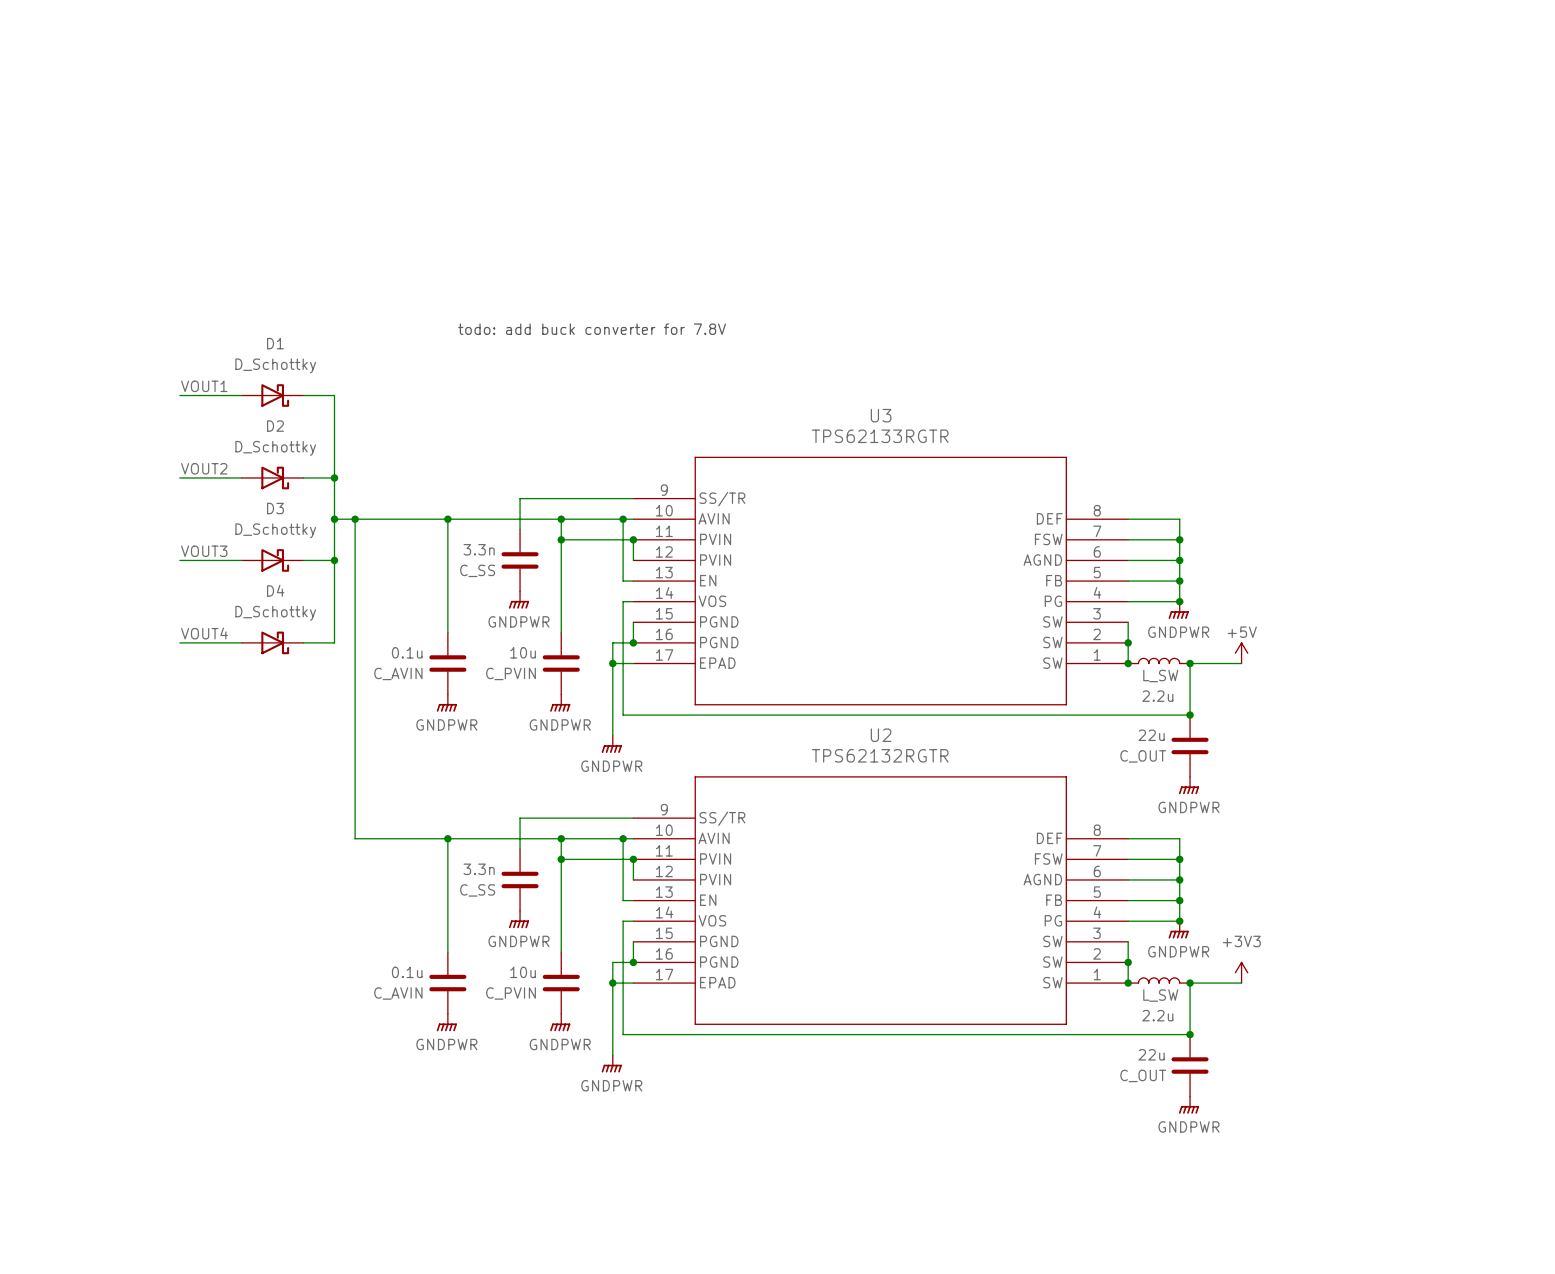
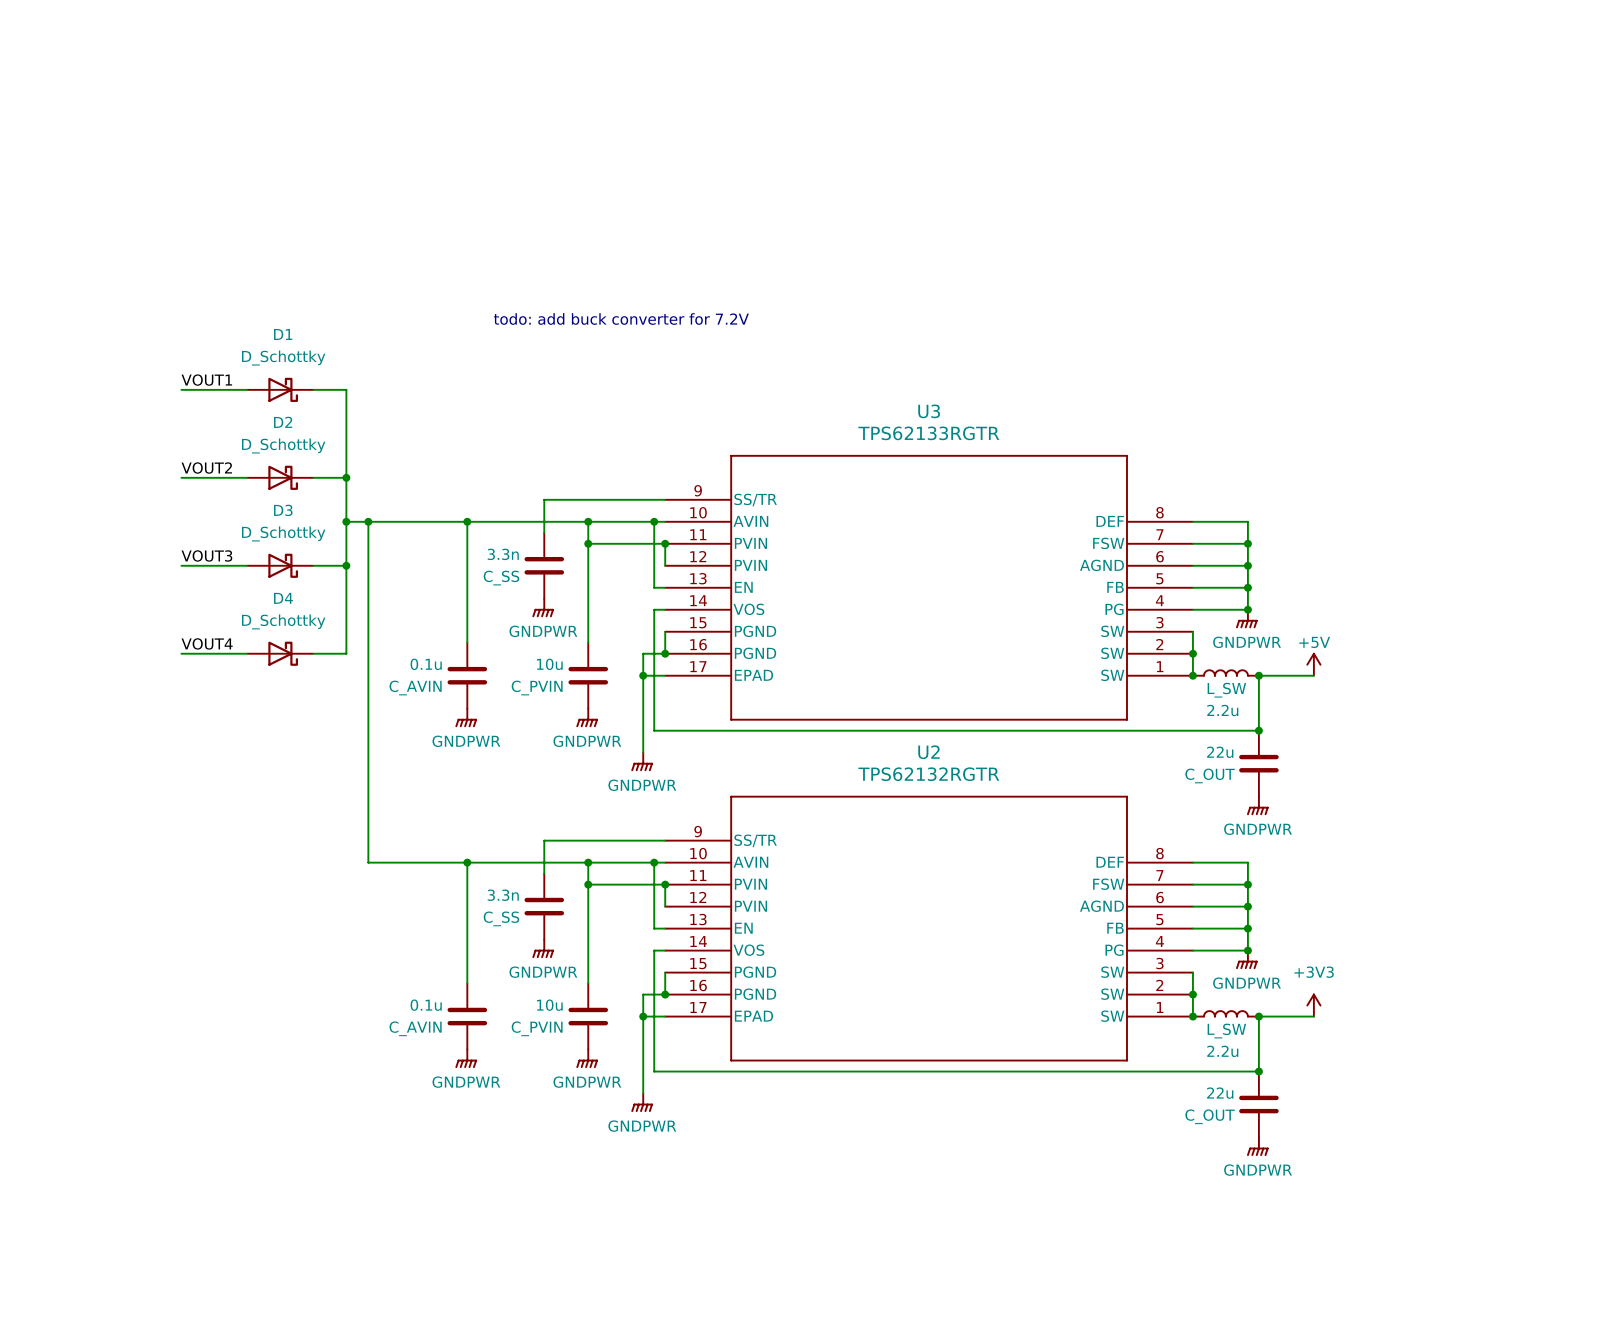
text: todo: add buck converter for 7.8V (592, 329) -> todo: add buck converter for 7.2V (621, 319)

